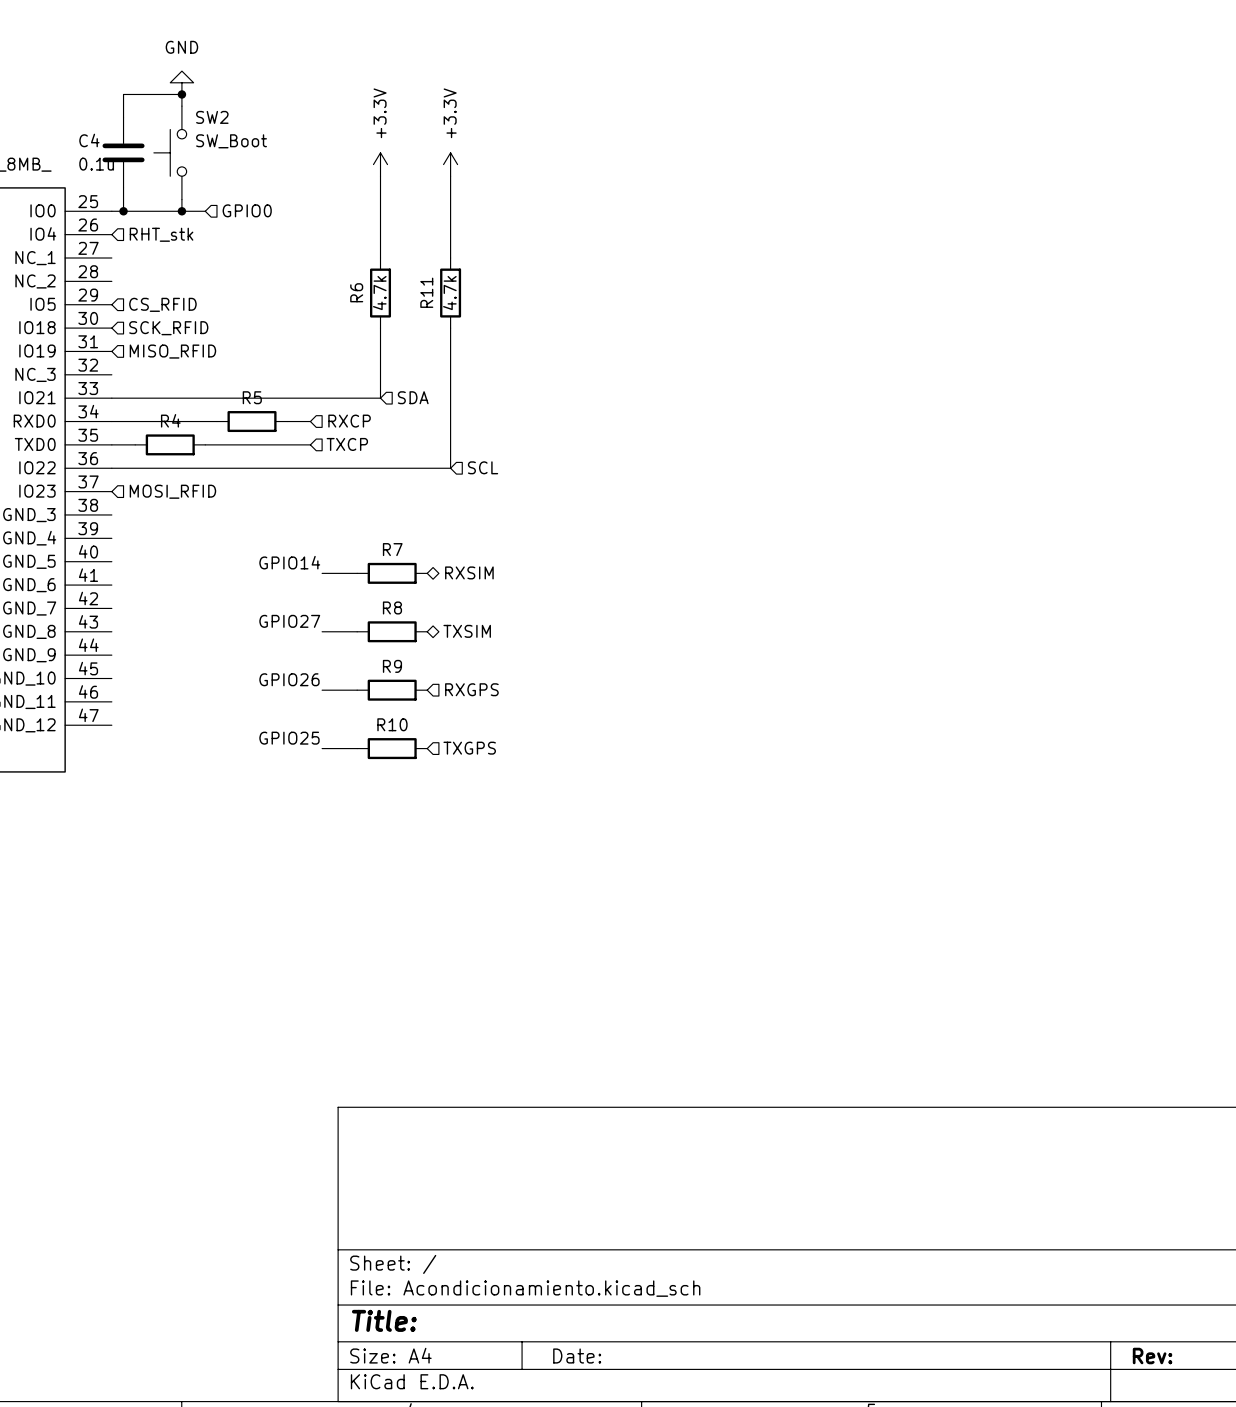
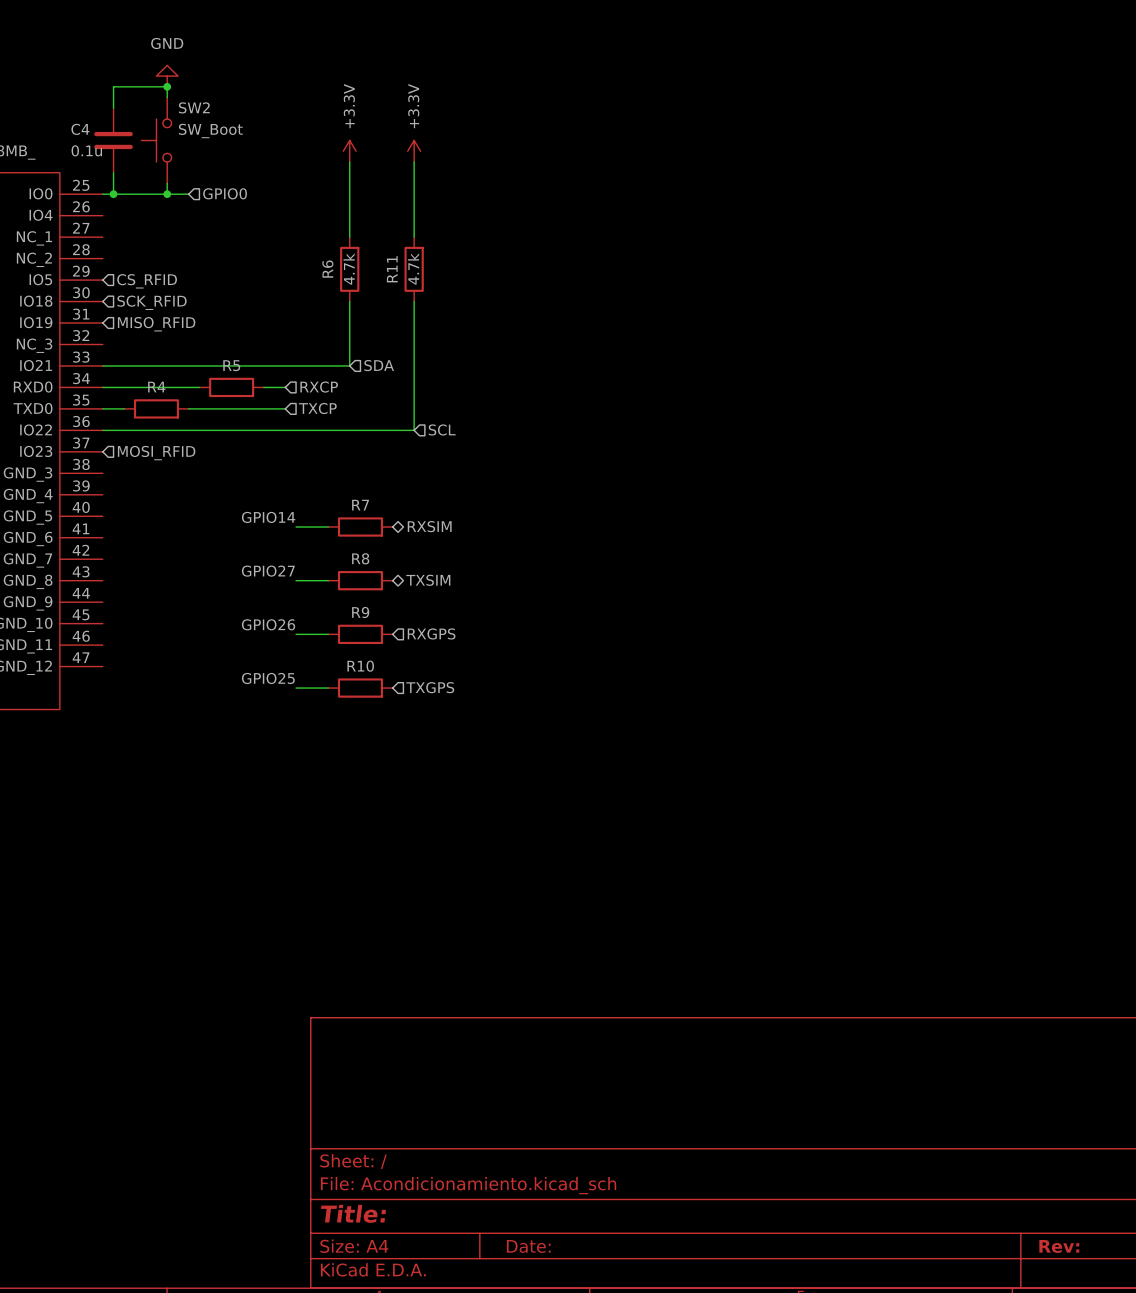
hierarchical label: RHT_stk (161, 234) -> none

